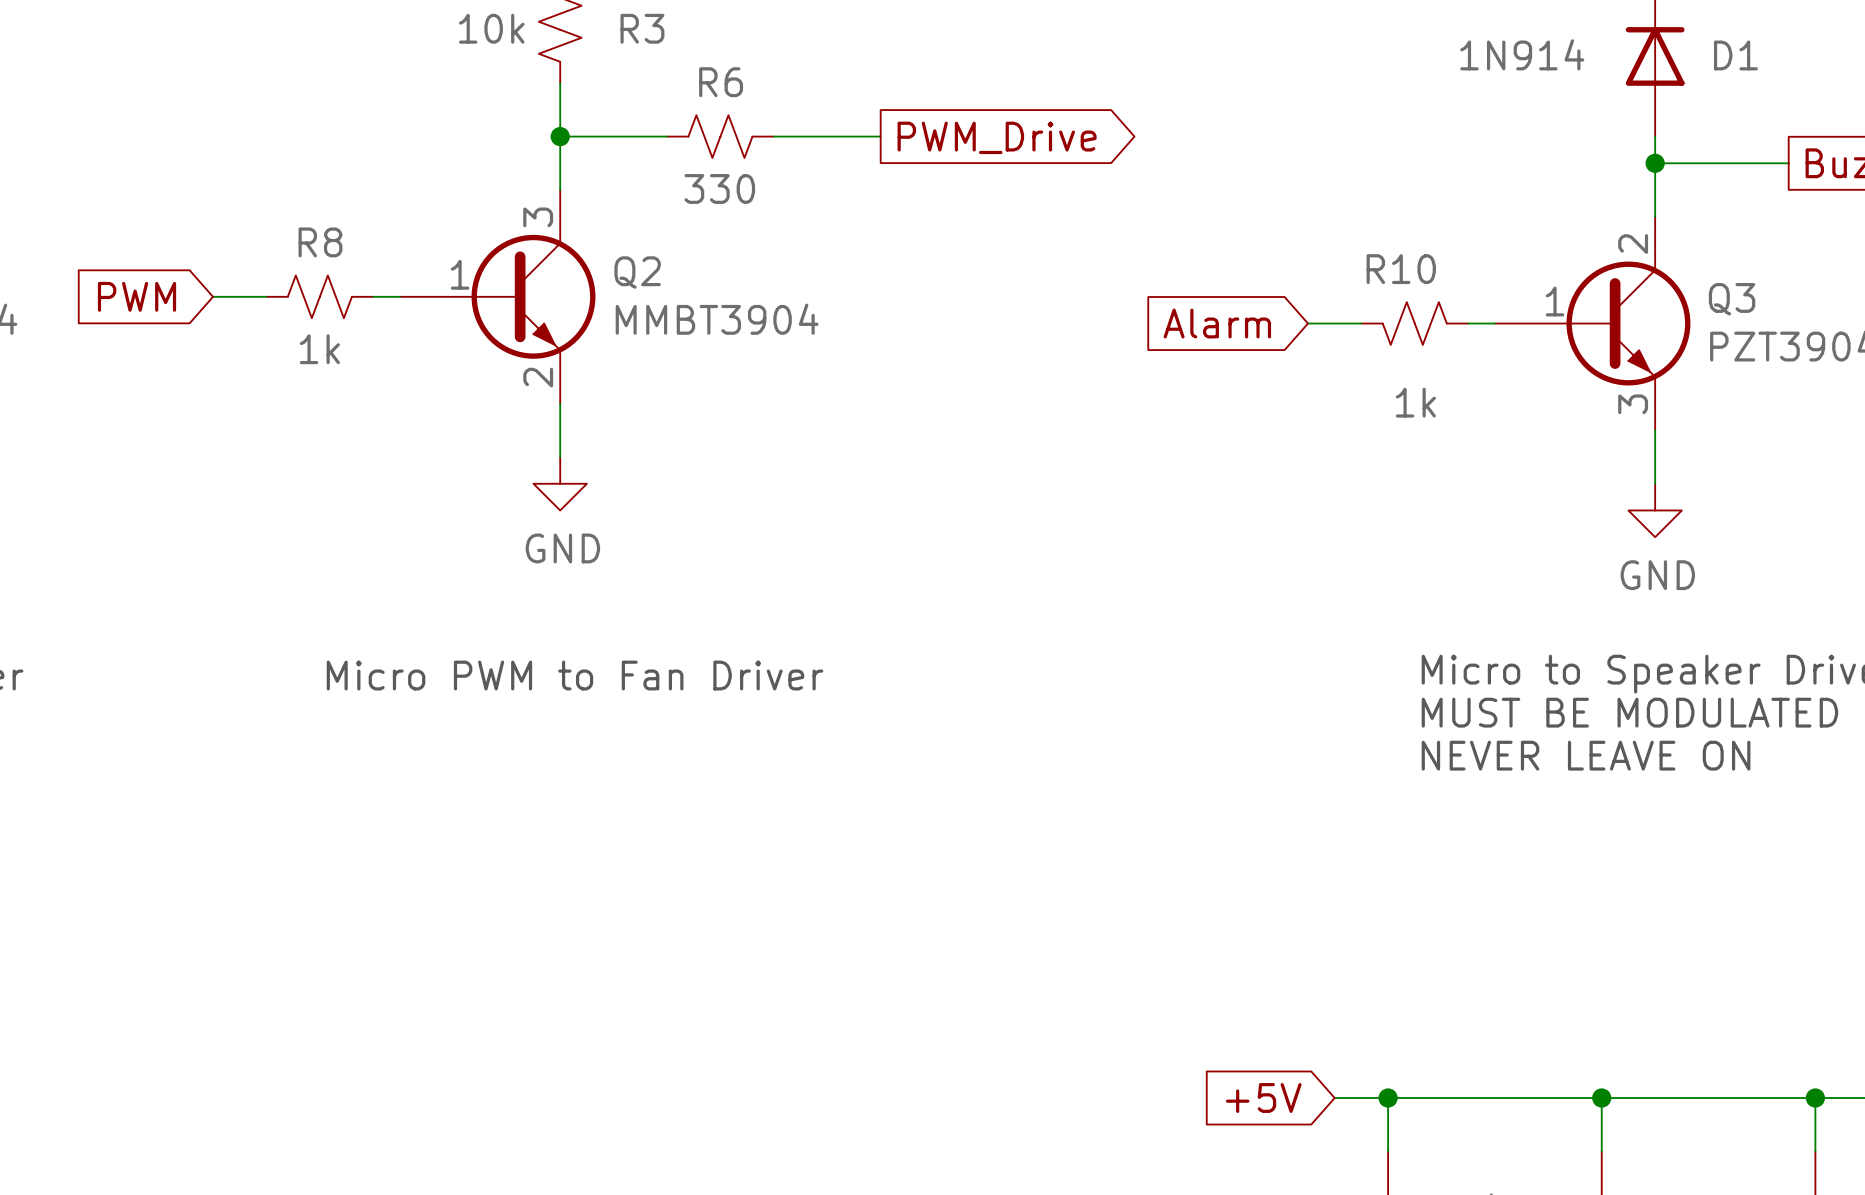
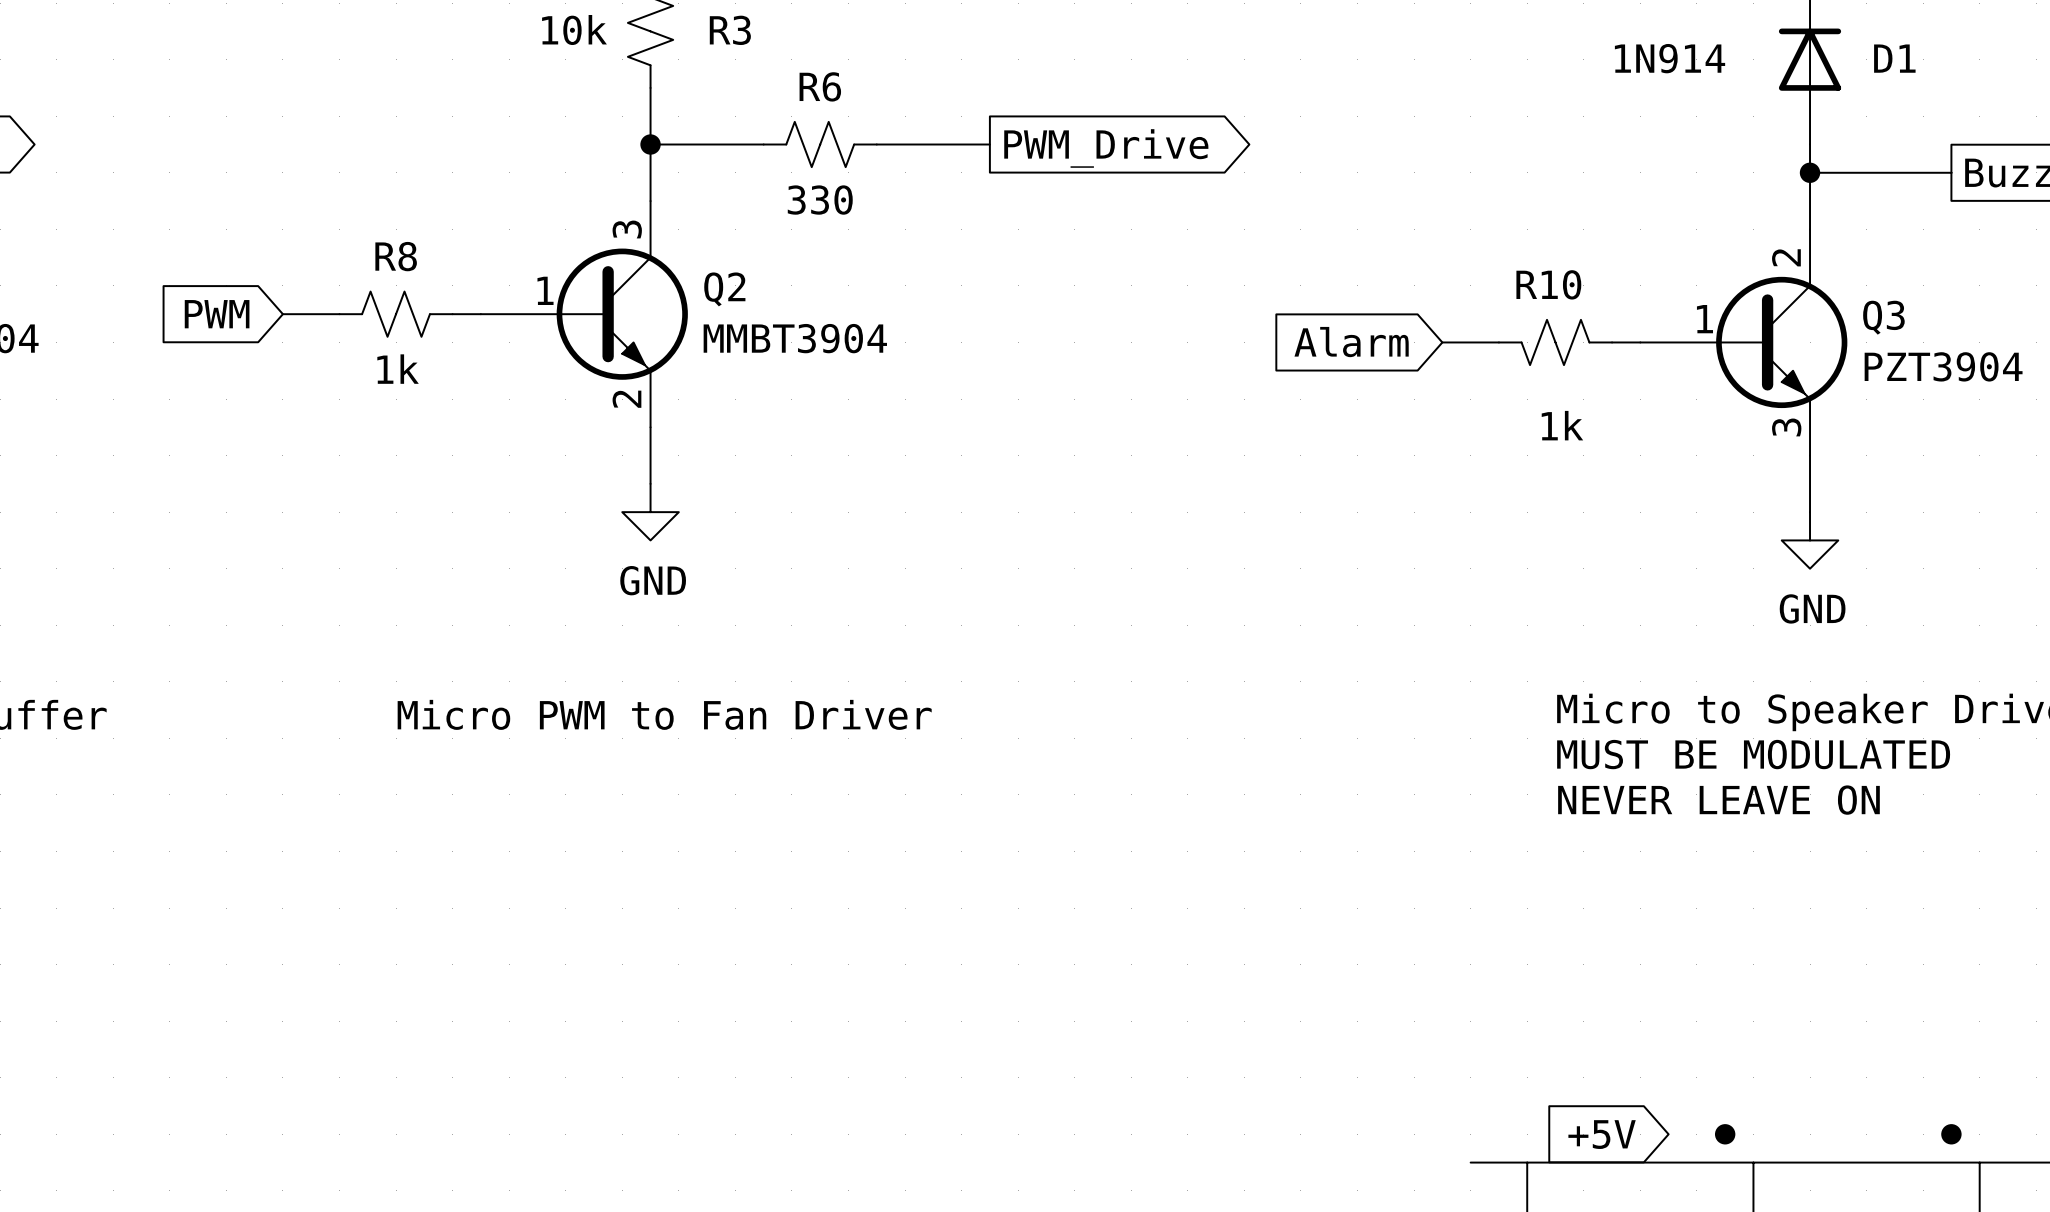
global label position: +5V (1263, 1098) -> +5V (1602, 1134)
junction: (1388, 1098) -> none
junction position: (1601, 1098) -> (1725, 1134)
junction position: (1815, 1098) -> (1951, 1134)

